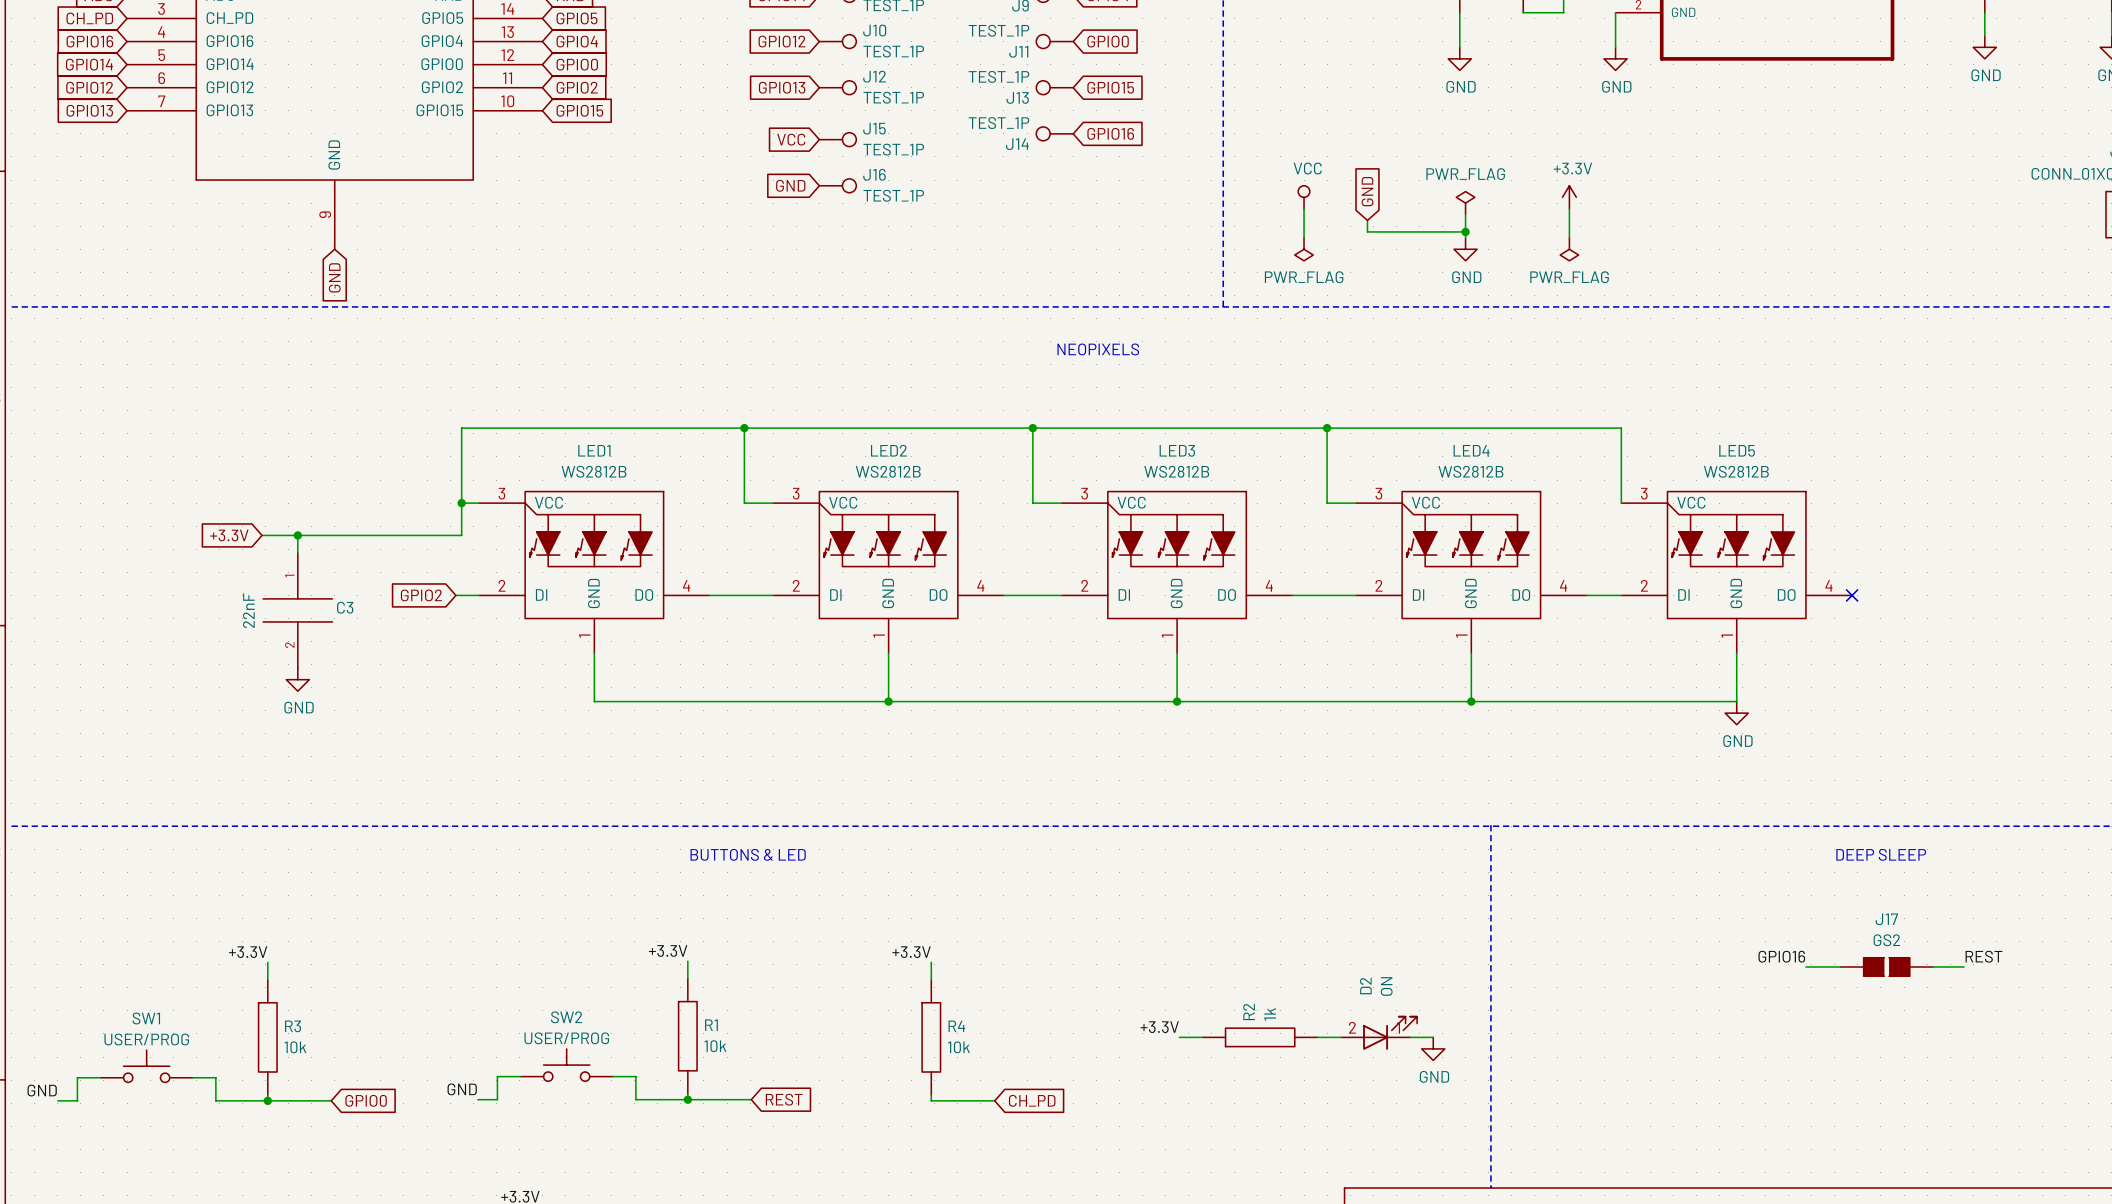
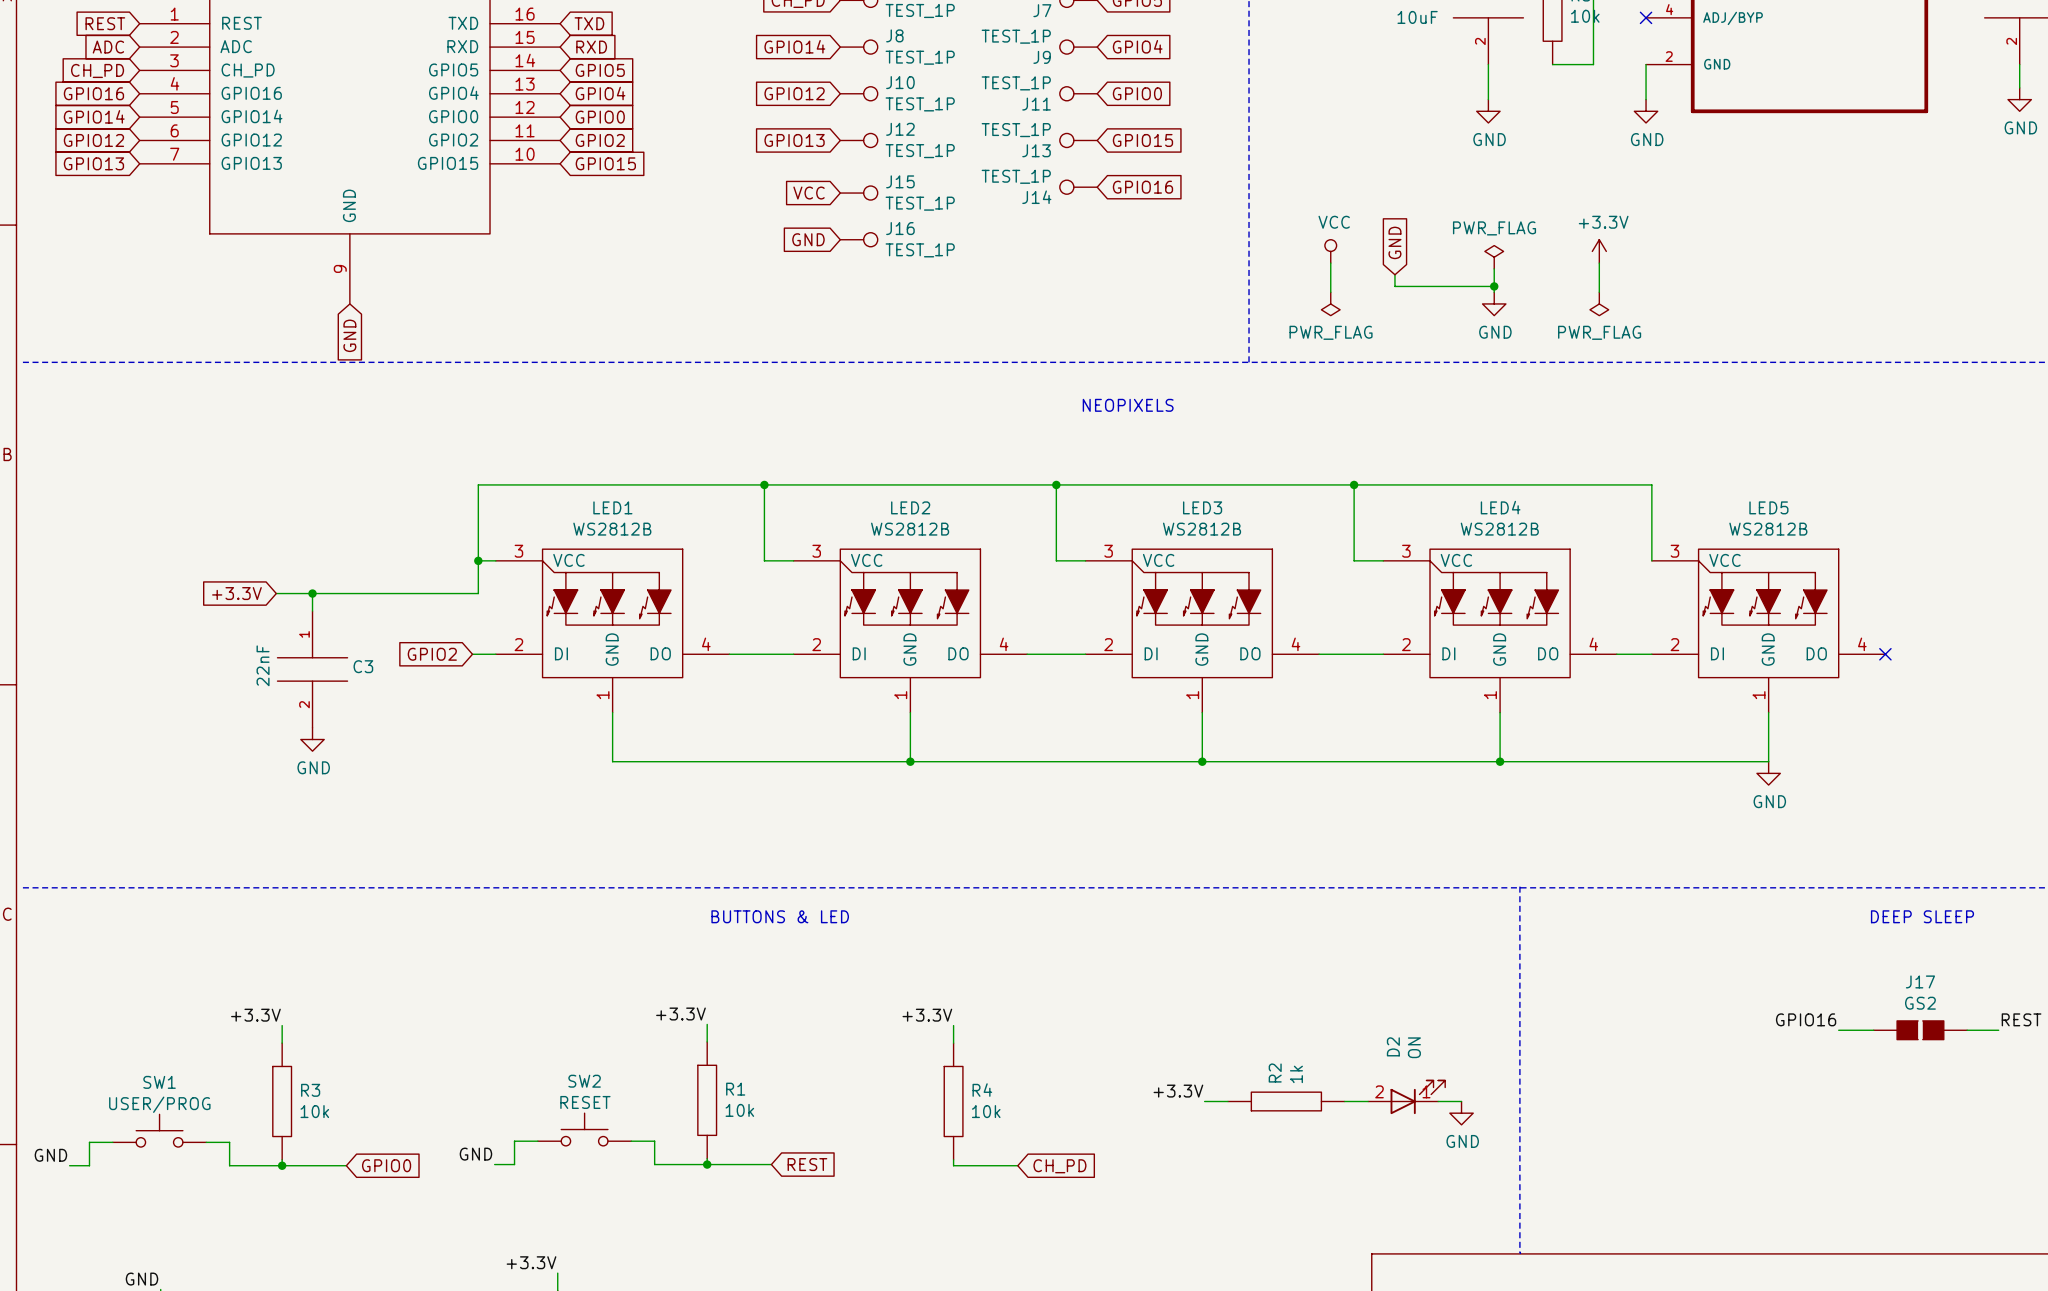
SW2 value: USER/PROG (566, 1038) -> RESET (585, 1102)

